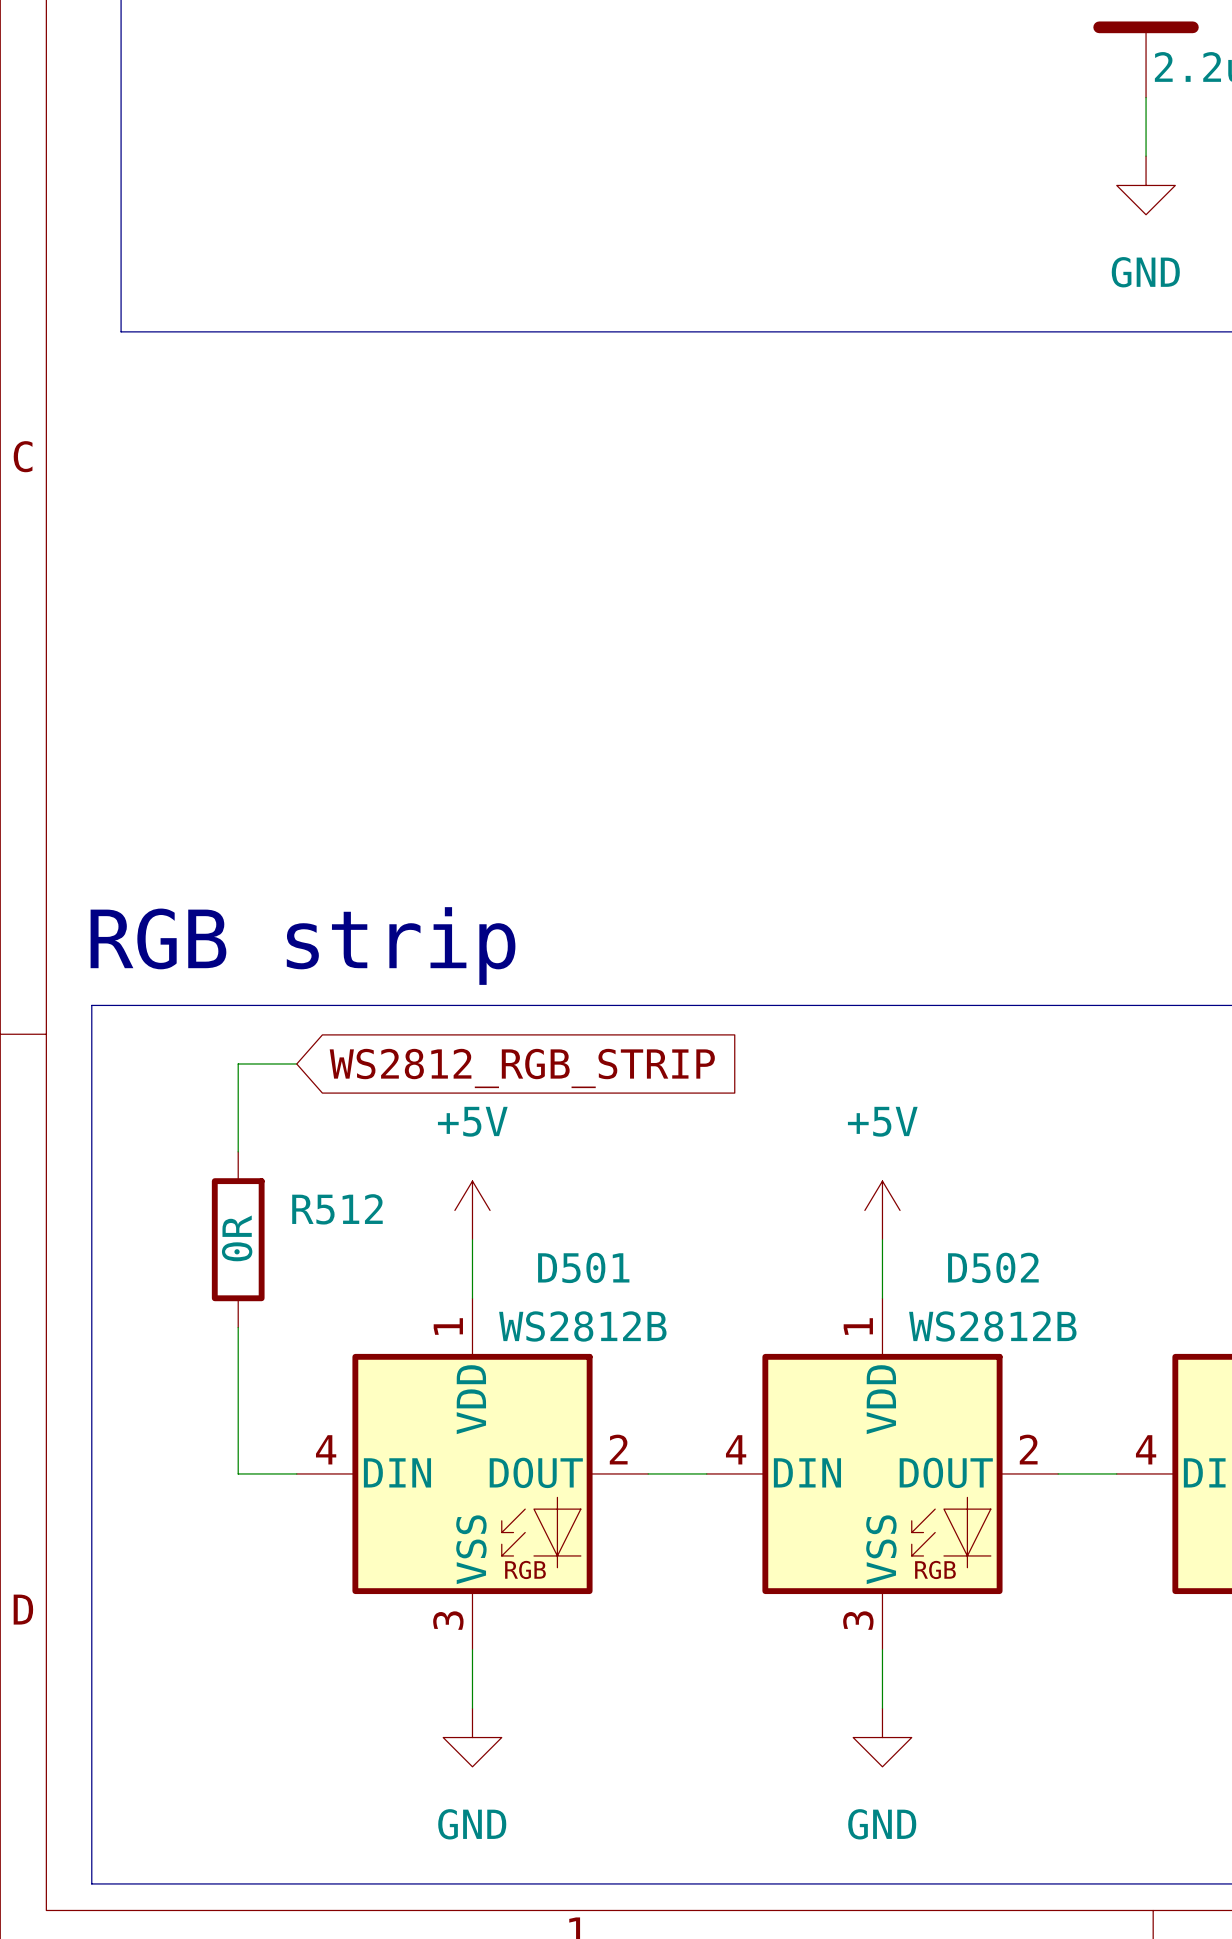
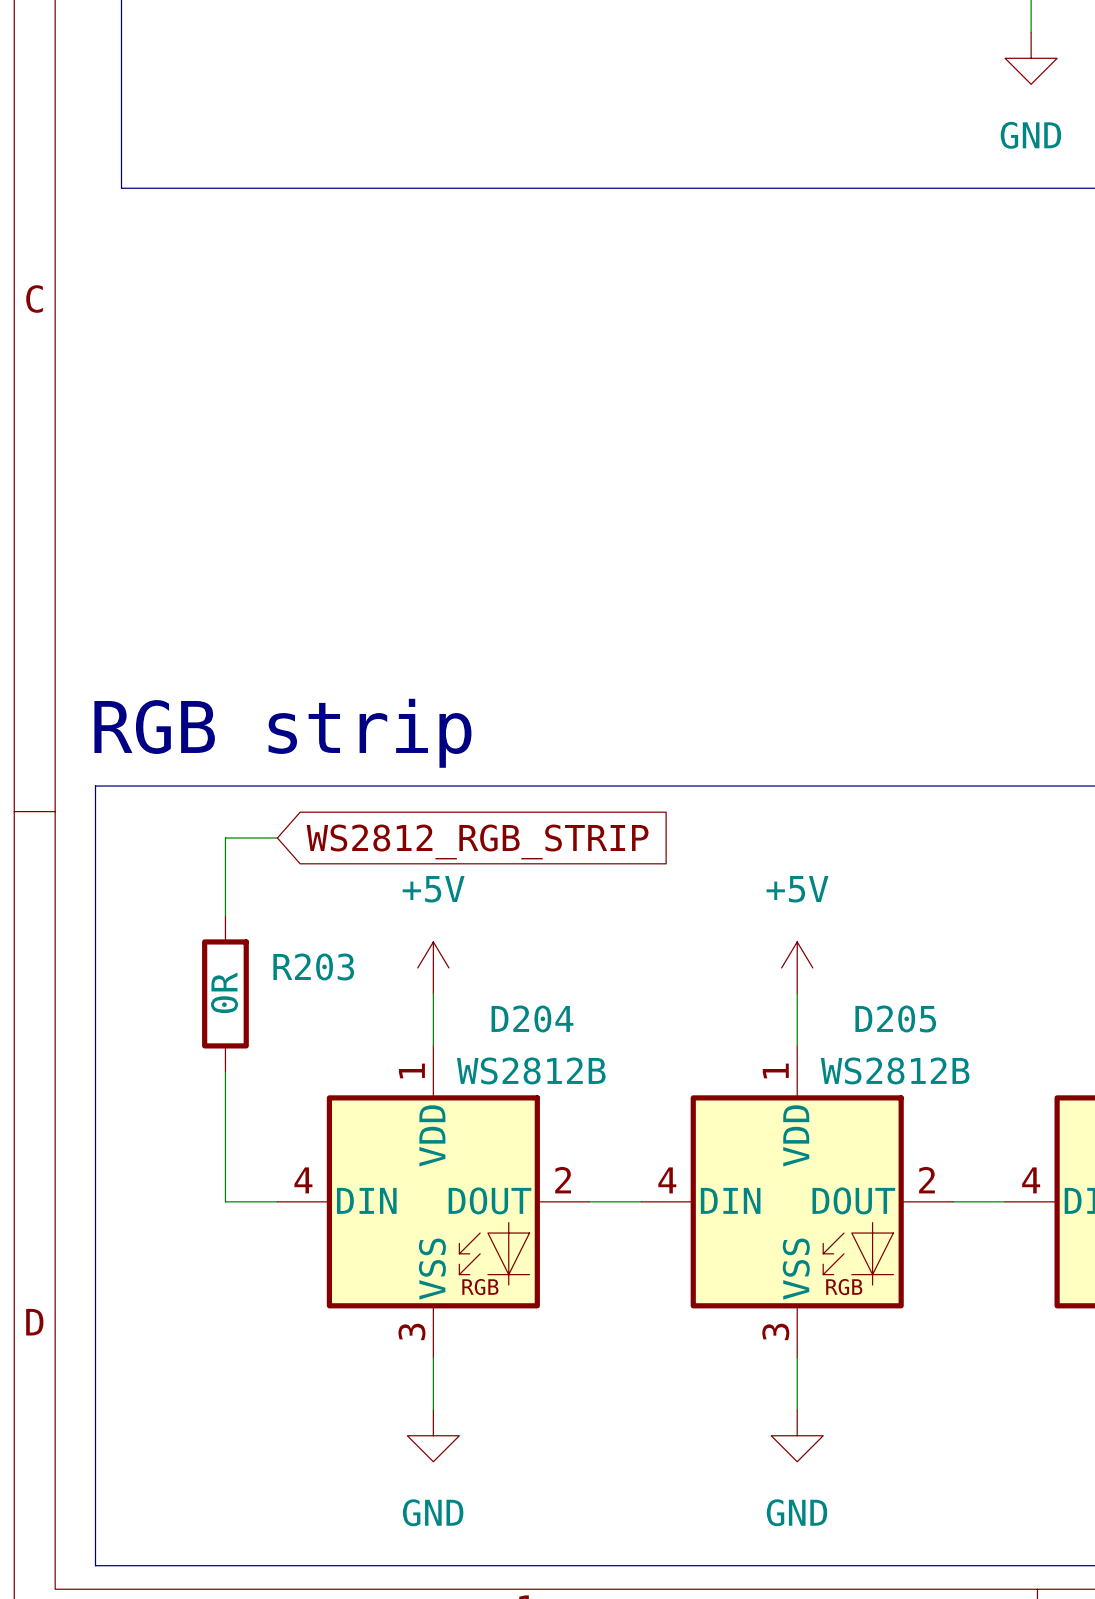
R512 name: R512 (337, 1209) -> R203 (313, 966)
D501 name: D501 (583, 1267) -> D204 (532, 1018)
D502 name: D502 (993, 1267) -> D205 (895, 1018)

